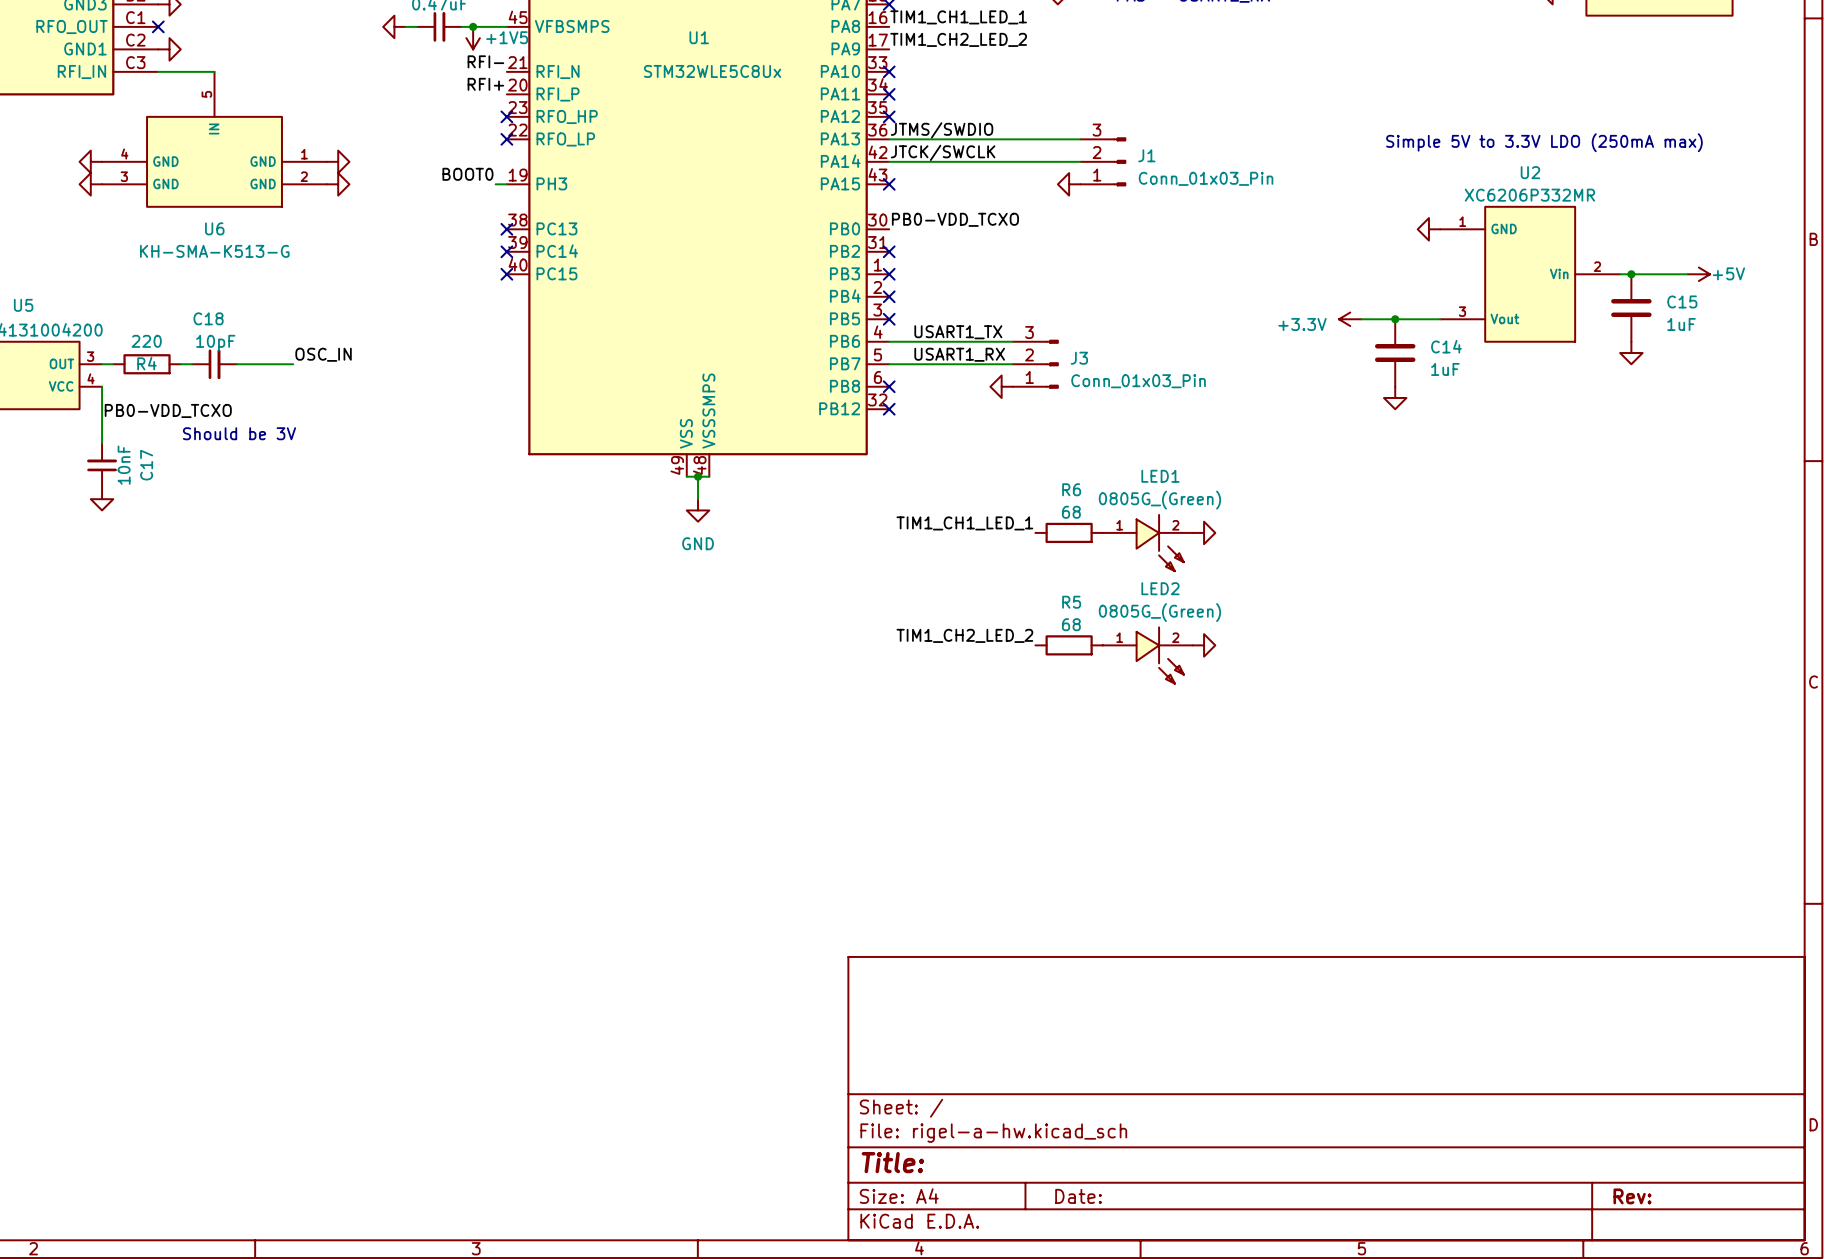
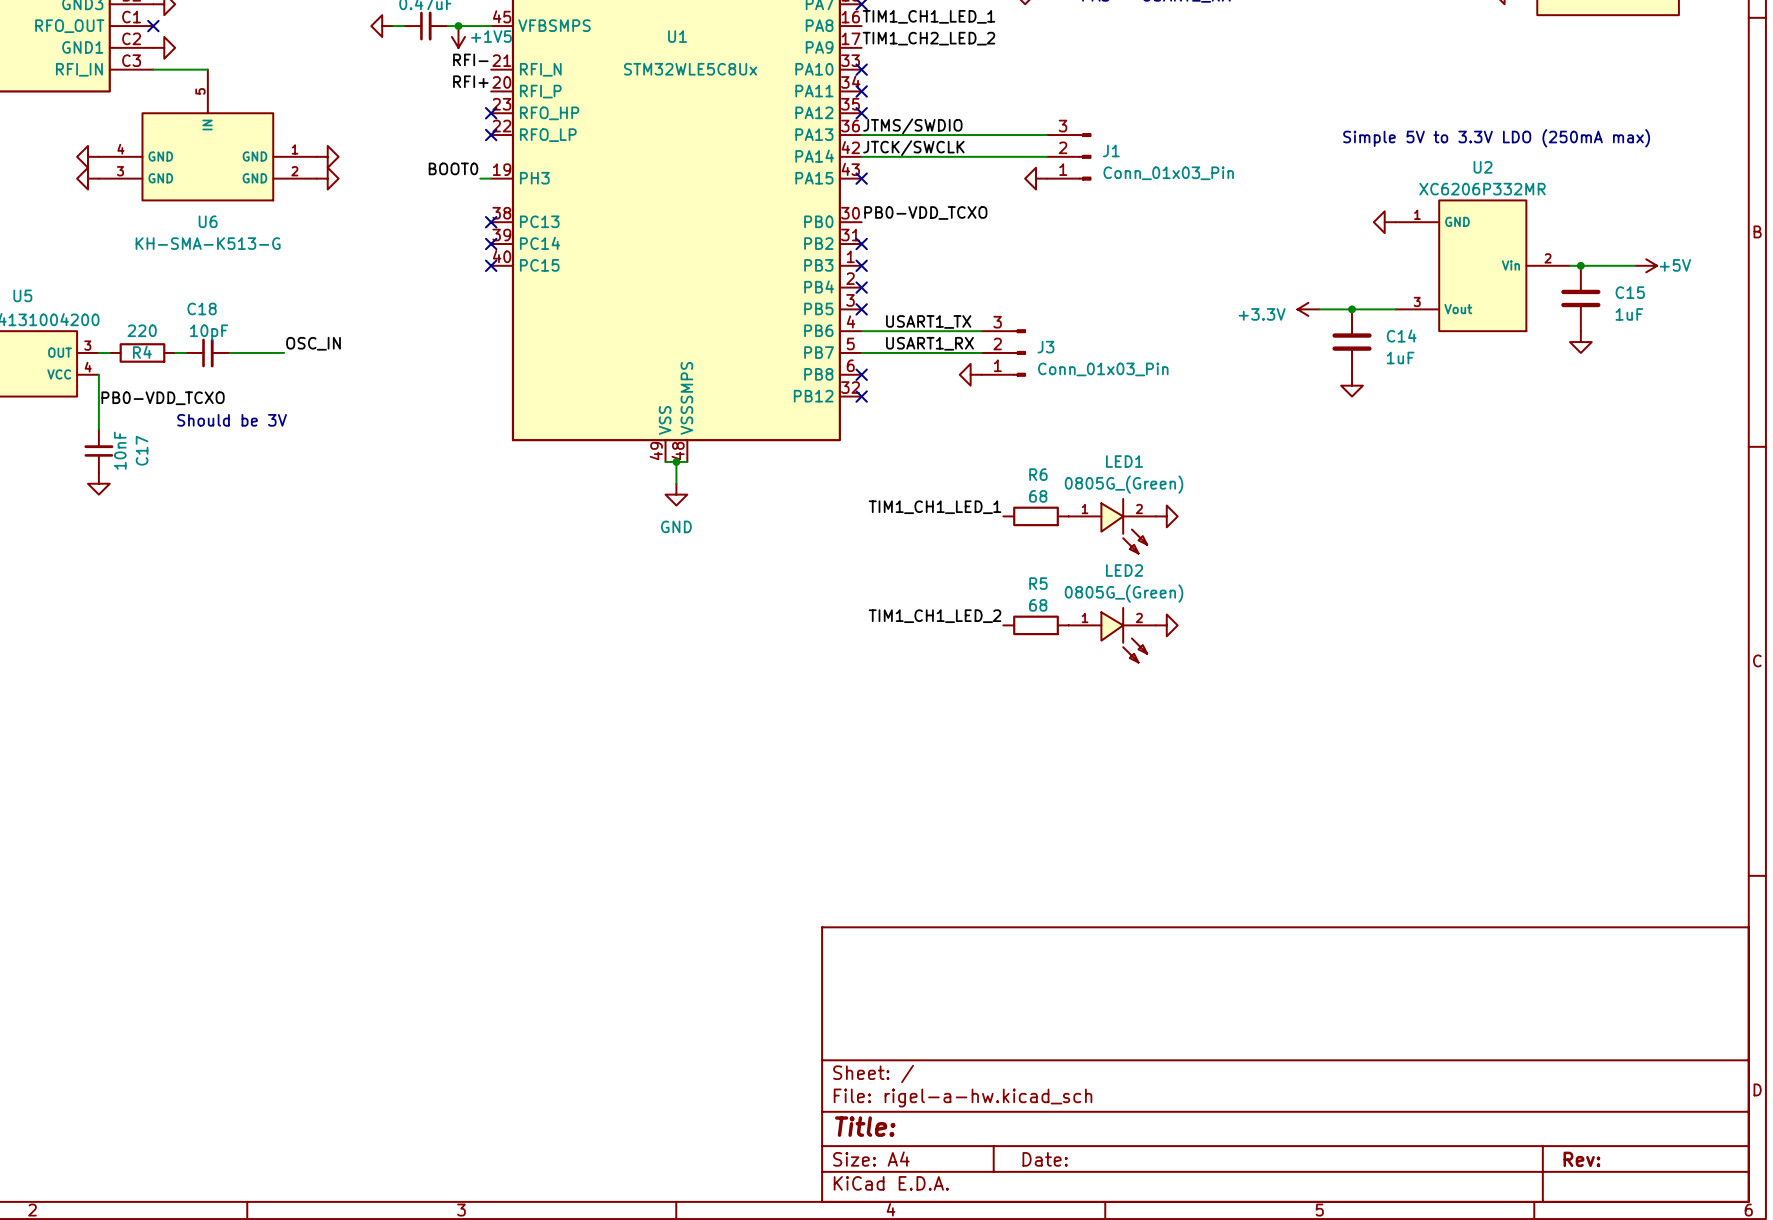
label: TIM1_CH2_LED_2 (964, 635) -> TIM1_CH1_LED_2 (935, 616)

